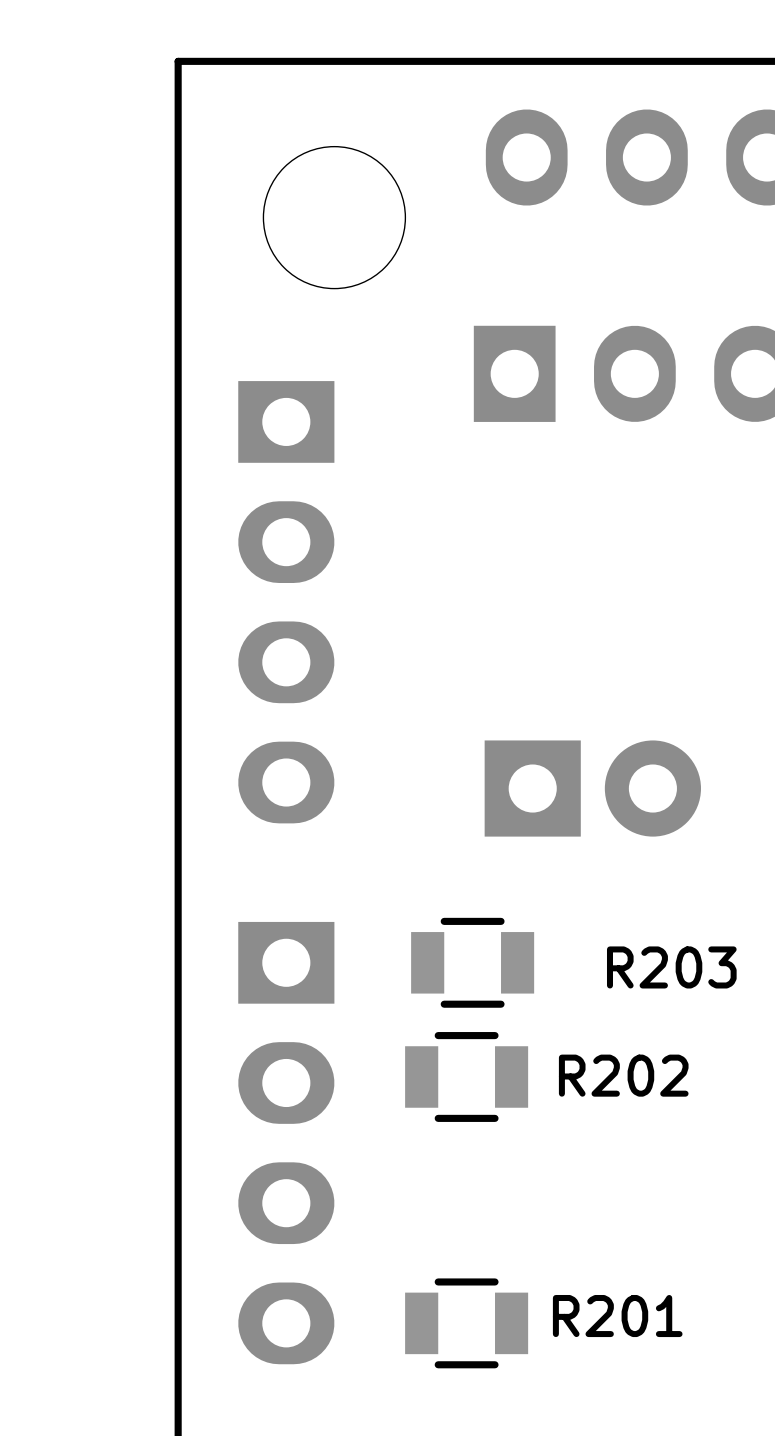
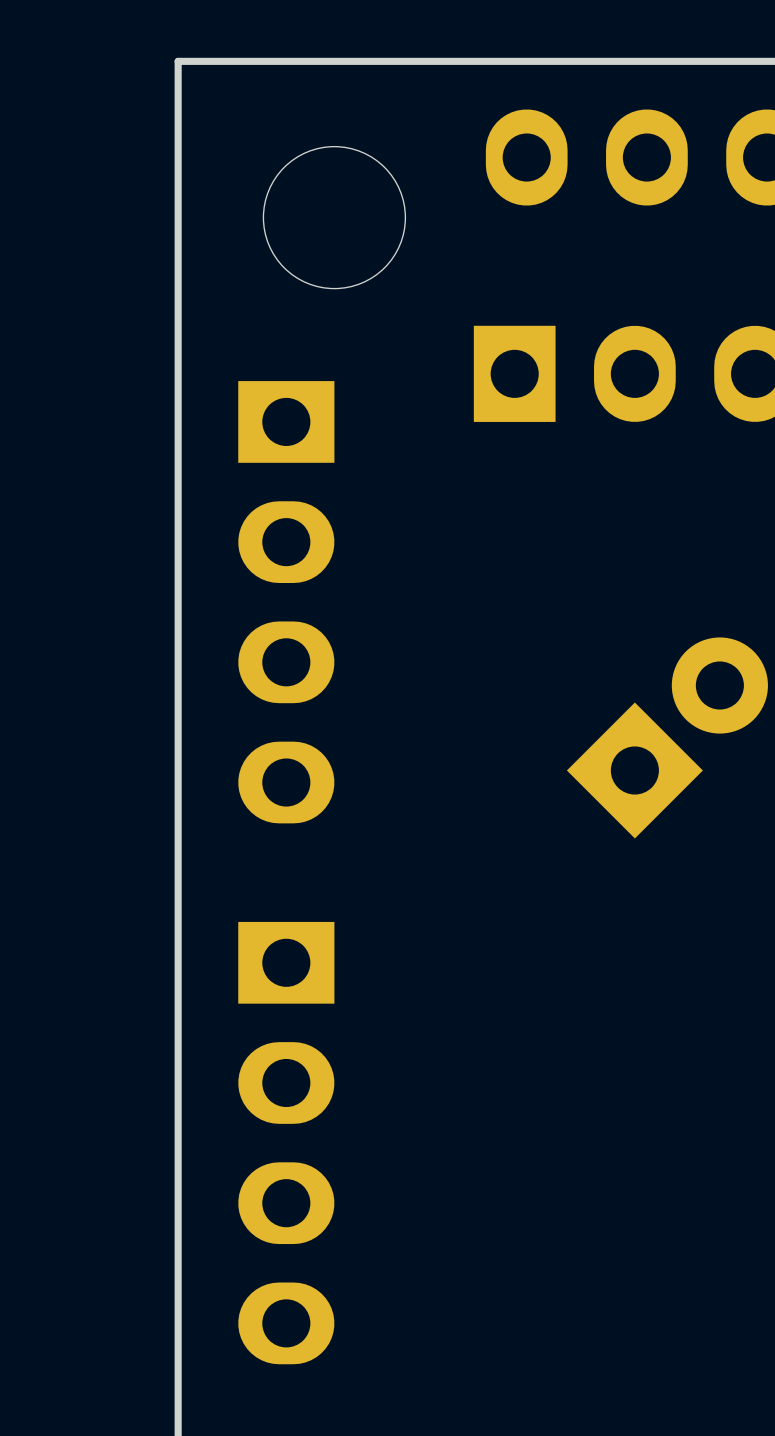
part: none -> (667, 737)
part: (592, 788) -> none
R203: (472, 962) -> none
R202: (466, 1076) -> none
R201: (466, 1323) -> none

